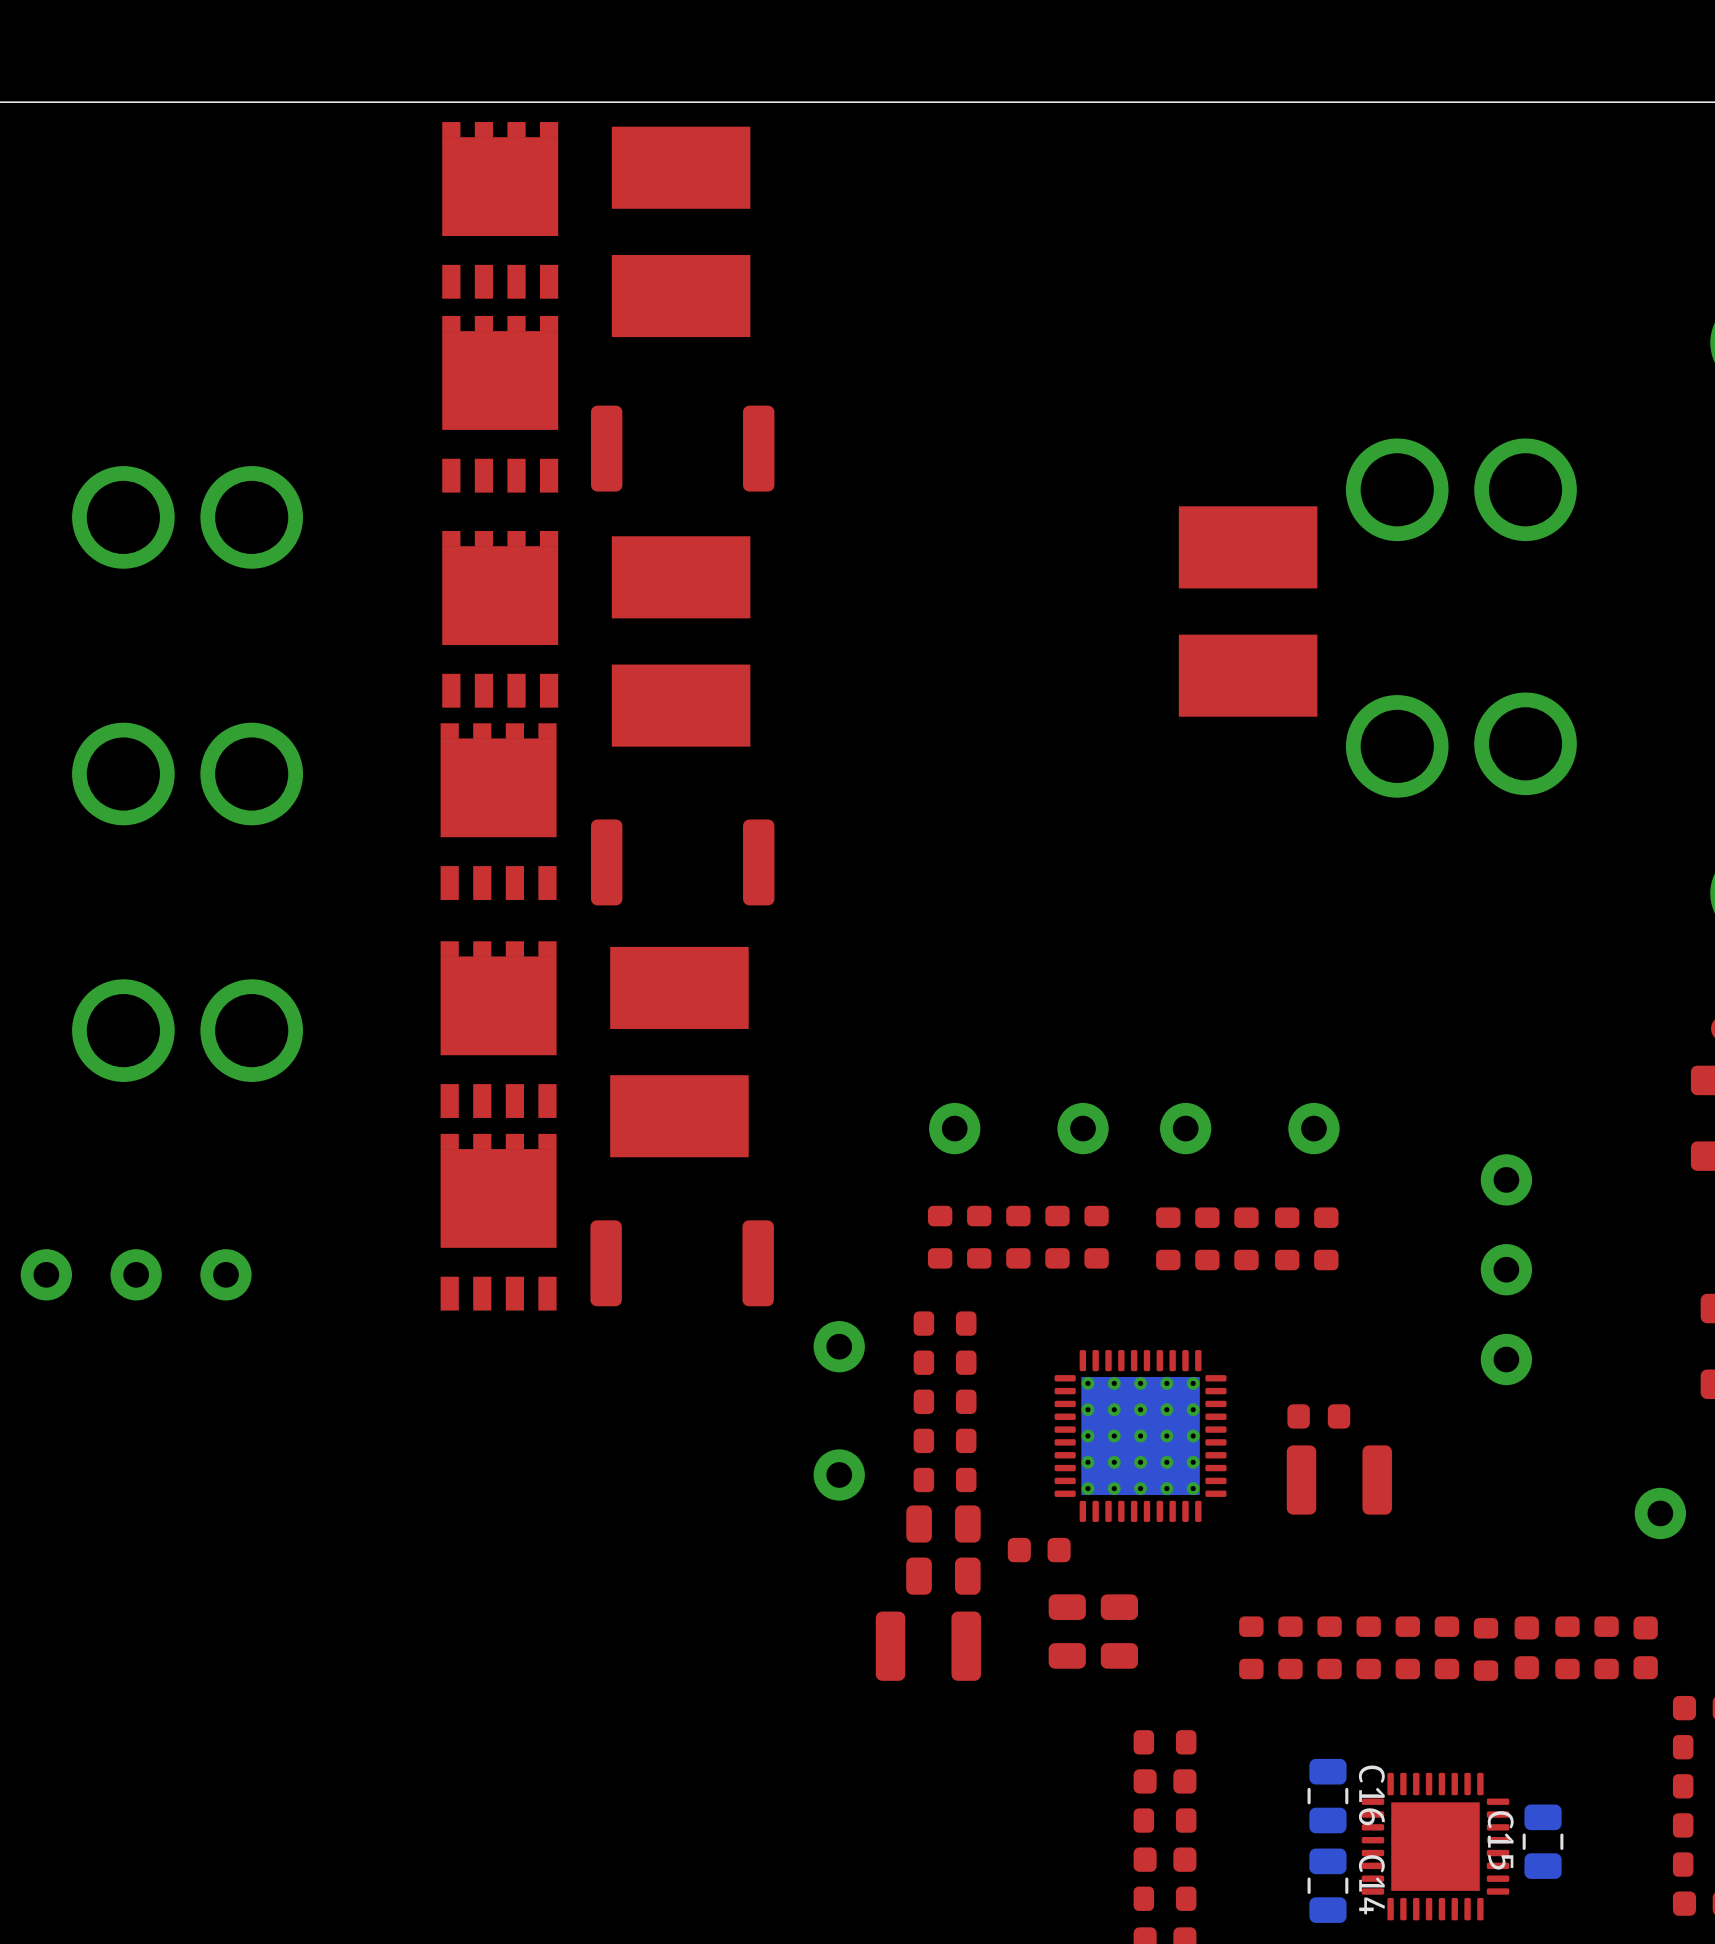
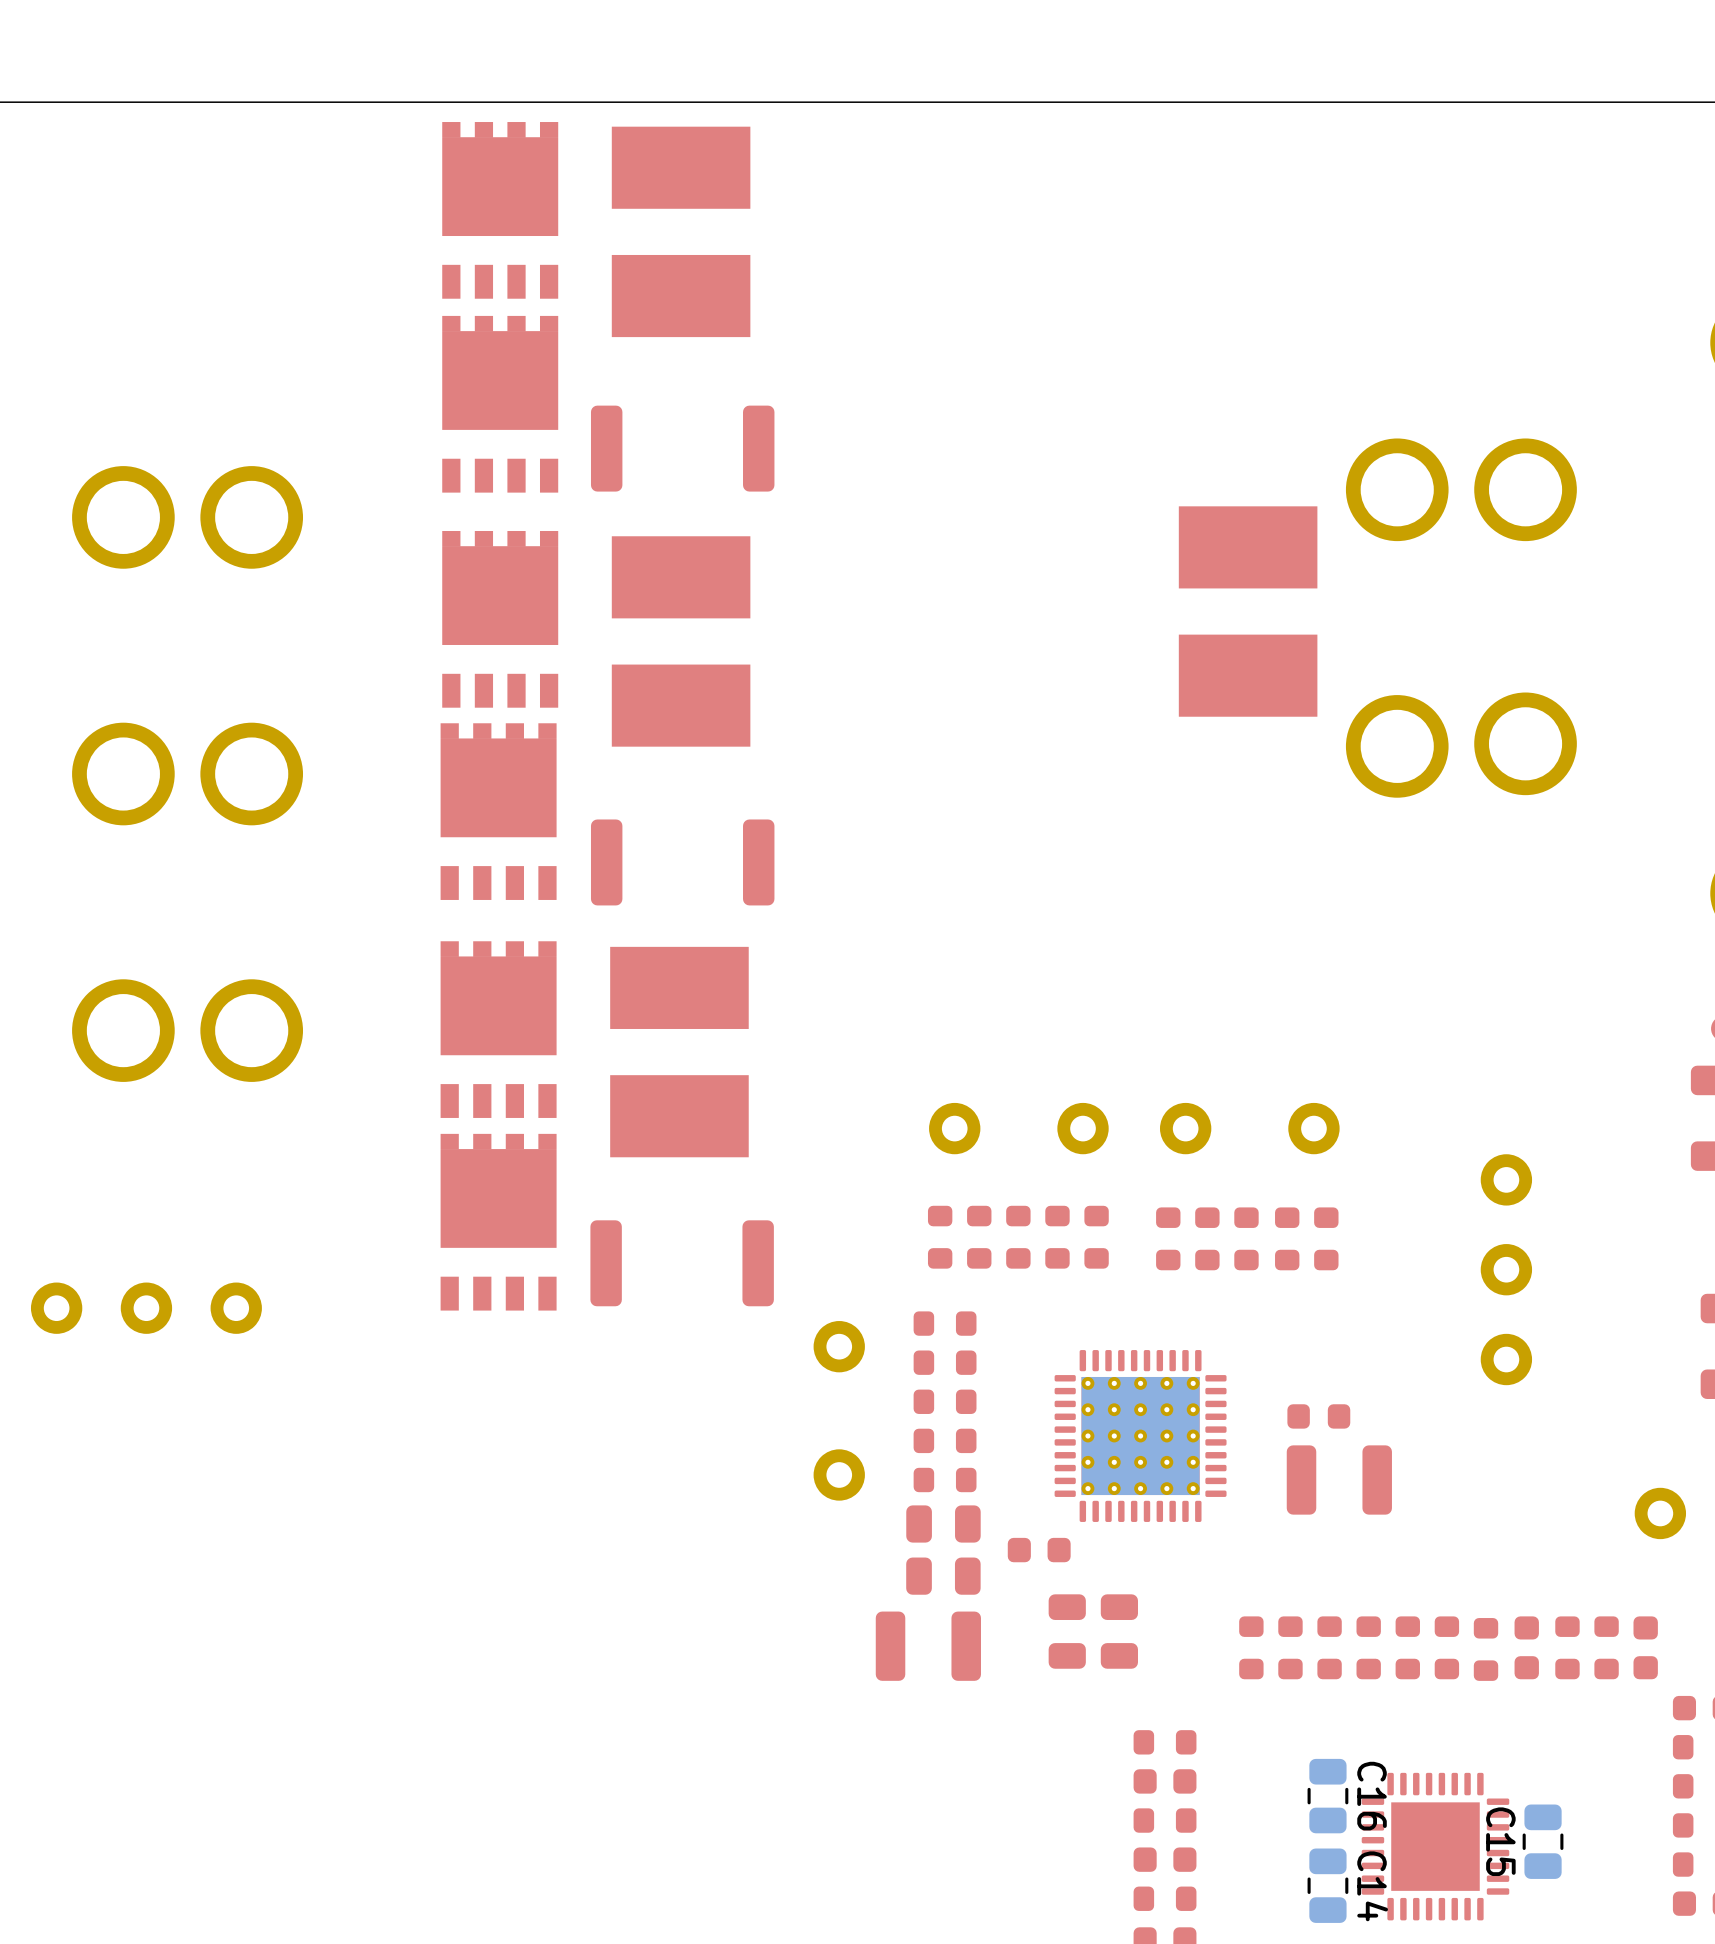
part position: (46, 1274) -> (56, 1308)
part position: (136, 1274) -> (146, 1308)
part position: (225, 1274) -> (236, 1308)

